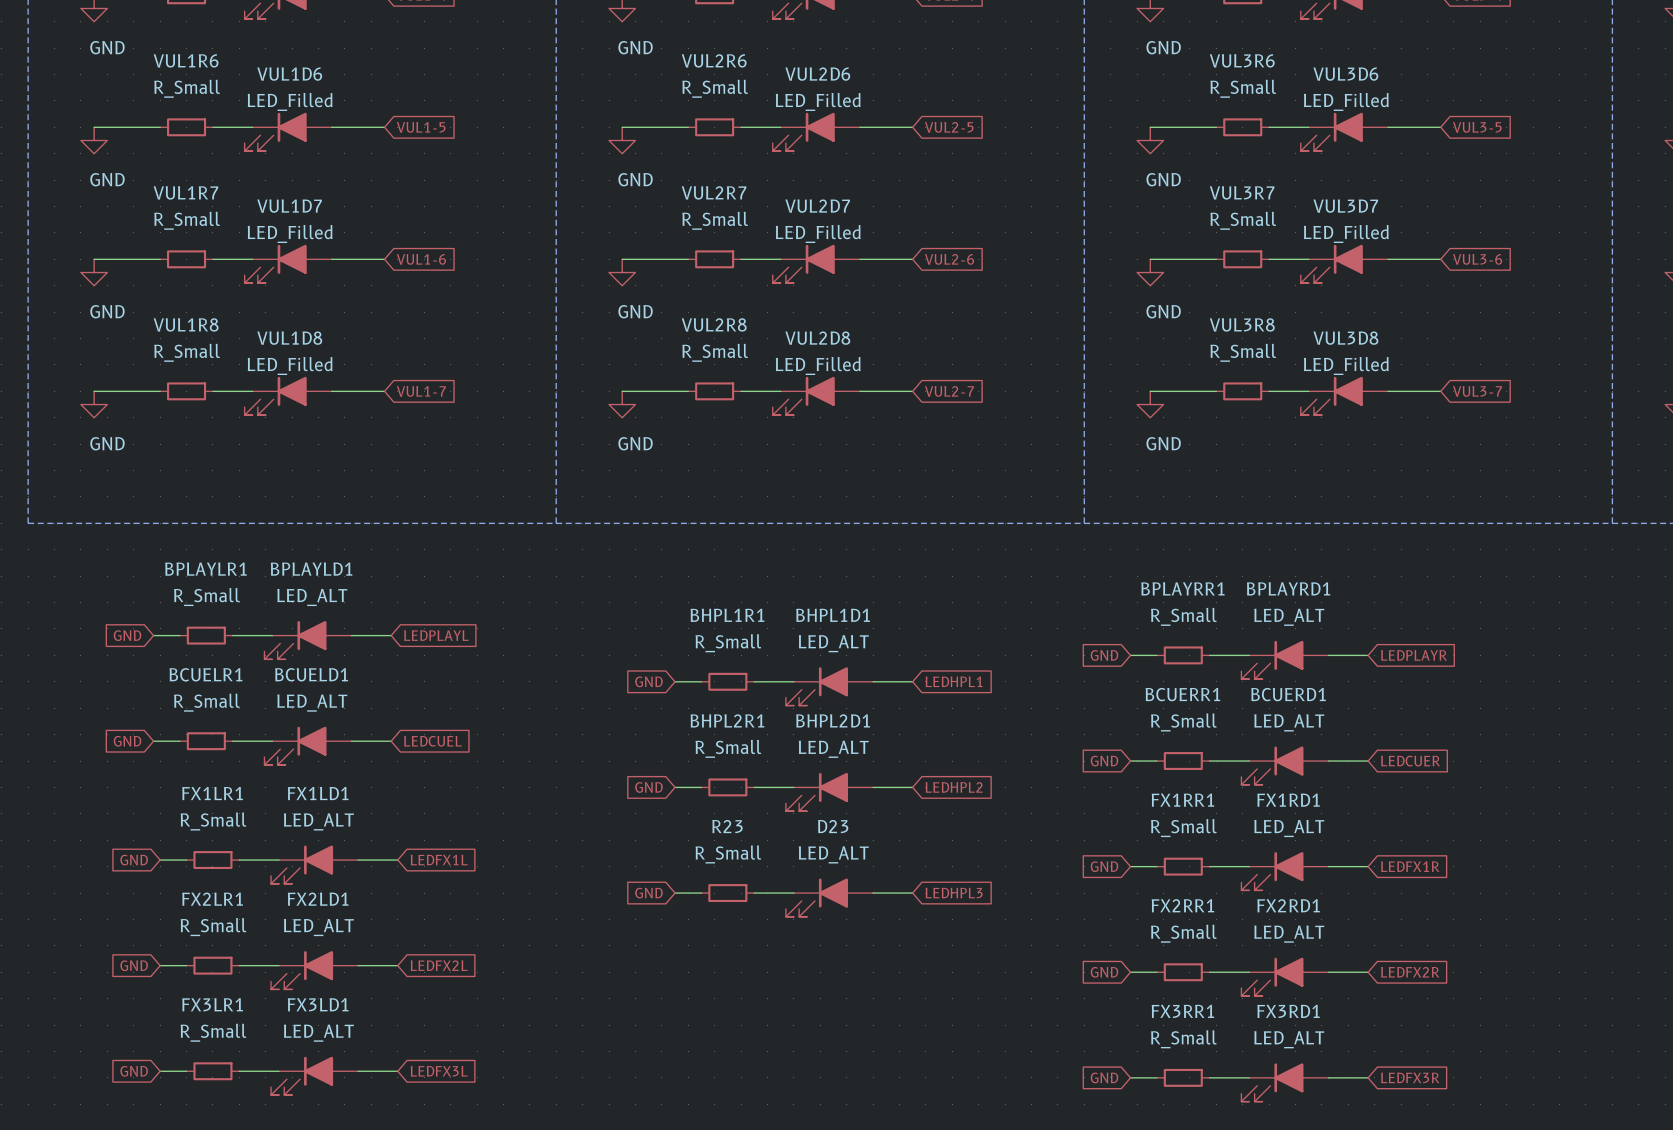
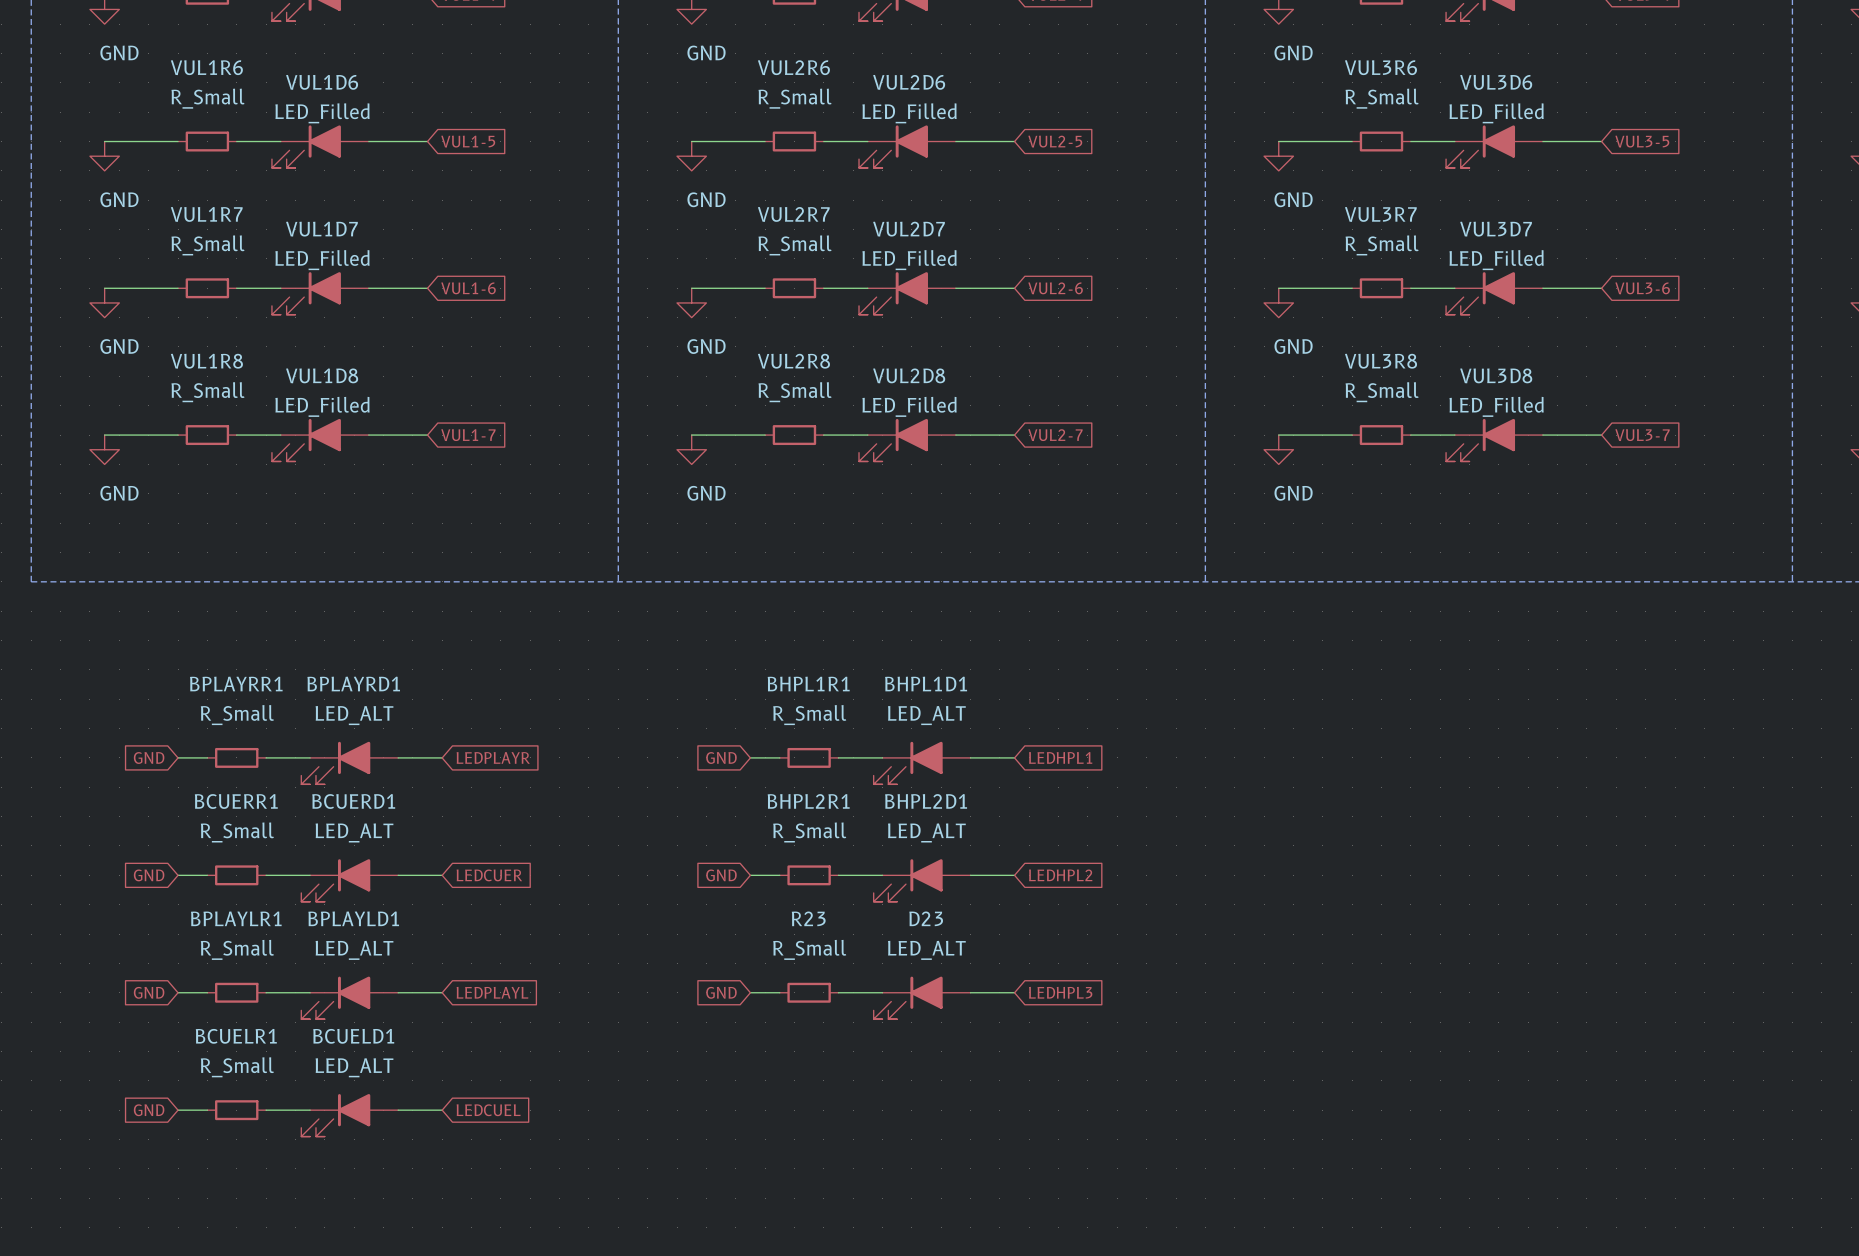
global label: GND (127, 635) -> none
wire: (153, 635) (179, 635) -> (178, 757) (207, 757)
BPLAYLR1 position: (206, 635) -> (236, 992)
wire: (232, 635) (272, 635) -> (266, 757) (310, 757)
wire: (351, 635) (391, 635) -> (398, 757) (442, 757)
global label position: LEDPLAYL (436, 635) -> LEDPLAYL (492, 992)
BPLAYLD1 position: (308, 640) -> (349, 997)
global label: GND (1104, 655) -> none
wire: (1130, 655) (1156, 655) -> none
BPLAYRR1 position: (1183, 655) -> (236, 757)
wire: (1209, 655) (1249, 655) -> none
wire: (1328, 655) (1368, 655) -> none
global label: LEDPLAYR (1414, 655) -> none
BPLAYRD1 position: (1284, 660) -> (349, 763)
global label: none -> GND (149, 758)
global label: none -> LEDPLAYR (493, 757)
global label: GND (127, 741) -> none
wire: (153, 741) (179, 741) -> none
BCUELR1 position: (206, 741) -> (236, 1110)
wire: (232, 741) (272, 741) -> none
wire: (351, 741) (391, 741) -> none
global label position: LEDCUEL (432, 741) -> LEDCUEL (488, 1110)
BCUELD1 position: (308, 745) -> (349, 1115)
global label: GND (1104, 761) -> none
wire: (1130, 761) (1156, 761) -> none
BCUERR1 position: (1183, 761) -> (236, 875)
wire: (1209, 761) (1249, 761) -> none
wire: (1328, 761) (1368, 761) -> none
global label: LEDCUER (1410, 761) -> none
BCUERD1 position: (1284, 765) -> (349, 880)
global label: none -> GND (149, 875)
global label: none -> LEDCUER (489, 875)
global label position: GND (134, 860) -> GND (149, 992)
wire: (160, 860) (186, 860) -> (178, 875) (207, 875)
FX1LR1: R_Small (212, 860) -> none
wire: (239, 860) (278, 860) -> (266, 875) (310, 875)
wire: (358, 860) (397, 860) -> (398, 875) (442, 875)
global label: LEDFX1L (439, 860) -> none
FX1LD1: LED_ALT (314, 864) -> none
global label: GND (1104, 866) -> none
wire: (1130, 866) (1156, 866) -> none
FX1RR1: R_Small (1183, 866) -> none
wire: (1209, 866) (1249, 866) -> none
wire: (1328, 866) (1368, 866) -> none
global label: LEDFX1R (1410, 866) -> none
FX1RD1: LED_ALT (1284, 871) -> none
global label position: GND (134, 965) -> GND (149, 1110)
wire: (160, 965) (186, 965) -> (178, 992) (207, 992)
FX2LR1: R_Small (212, 965) -> none
wire: (239, 965) (278, 965) -> (266, 992) (310, 992)
wire: (358, 965) (397, 965) -> (398, 992) (442, 992)
global label: LEDFX2L (439, 965) -> none
FX2LD1: LED_ALT (314, 970) -> none
global label: GND (1104, 972) -> none
wire: (1130, 972) (1156, 972) -> none
FX2RR1: R_Small (1183, 972) -> none
wire: (1209, 972) (1249, 972) -> none
wire: (1328, 972) (1368, 972) -> none
global label: LEDFX2R (1410, 972) -> none
FX2RD1: LED_ALT (1284, 976) -> none
global label: GND (134, 1071) -> none
wire: (160, 1071) (186, 1071) -> (178, 1110) (207, 1110)
FX3LR1: R_Small (212, 1071) -> none
wire: (239, 1071) (278, 1071) -> (266, 1110) (310, 1110)
wire: (358, 1071) (397, 1071) -> (398, 1110) (442, 1110)
global label: LEDFX3L (439, 1071) -> none
FX3LD1: LED_ALT (314, 1075) -> none
global label: GND (1104, 1077) -> none
wire: (1130, 1077) (1156, 1077) -> none
FX3RR1: R_Small (1183, 1077) -> none
wire: (1209, 1077) (1249, 1077) -> none
wire: (1328, 1077) (1368, 1077) -> none
global label: LEDFX3R (1410, 1077) -> none
FX3RD1: LED_ALT (1284, 1082) -> none

